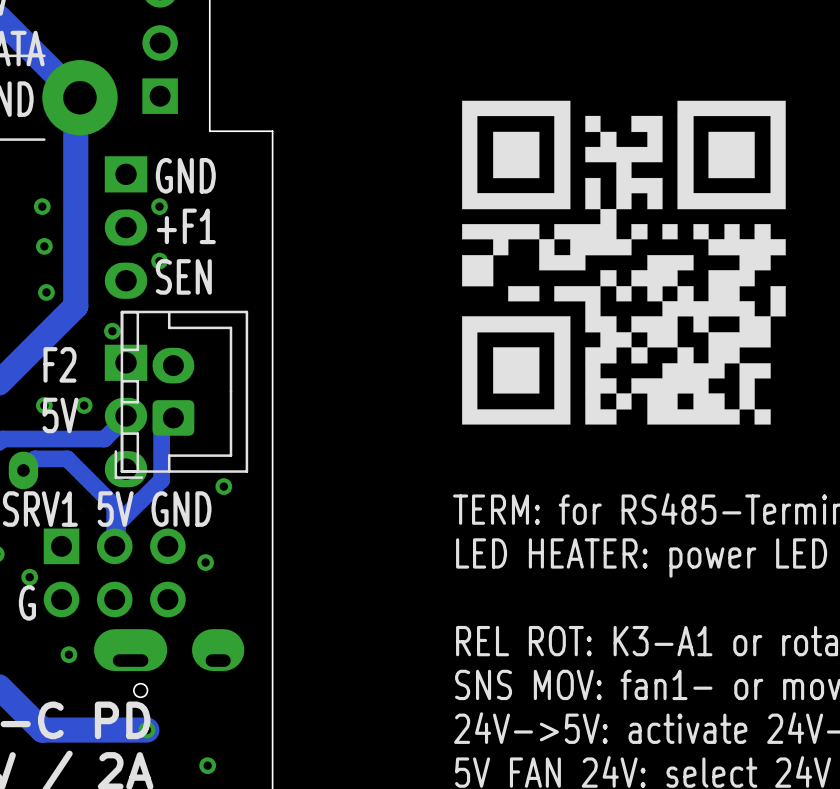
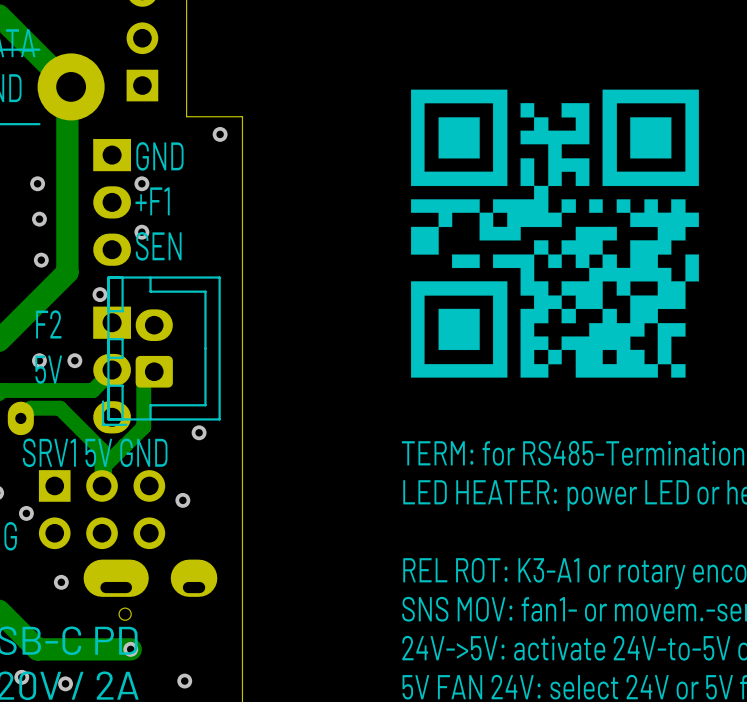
via: none -> (220, 134)
via: none -> (21, 677)
via: none -> (65, 683)

